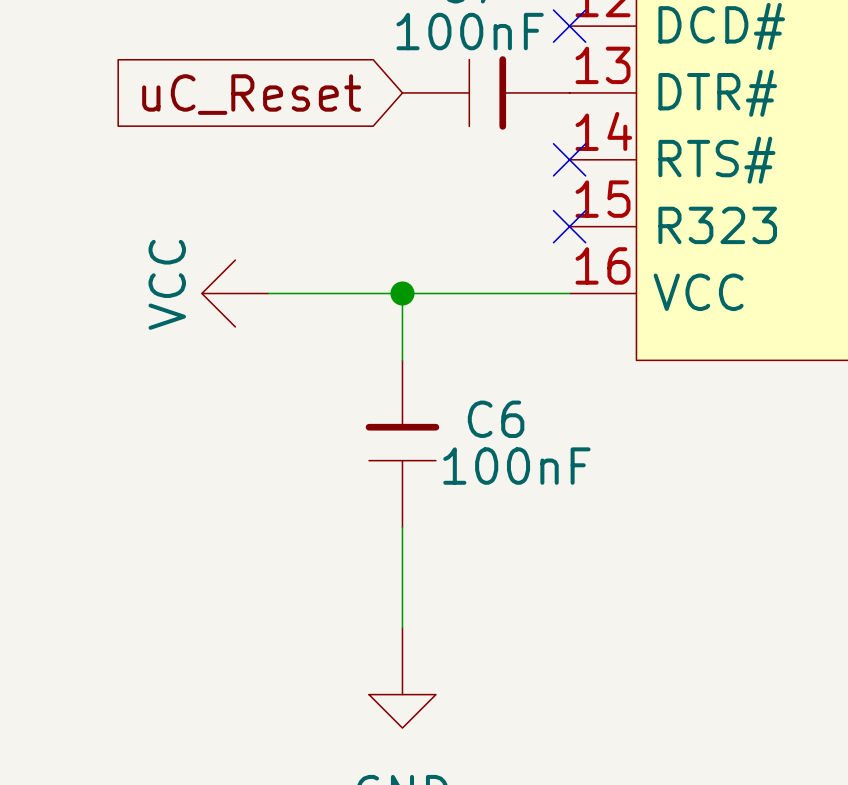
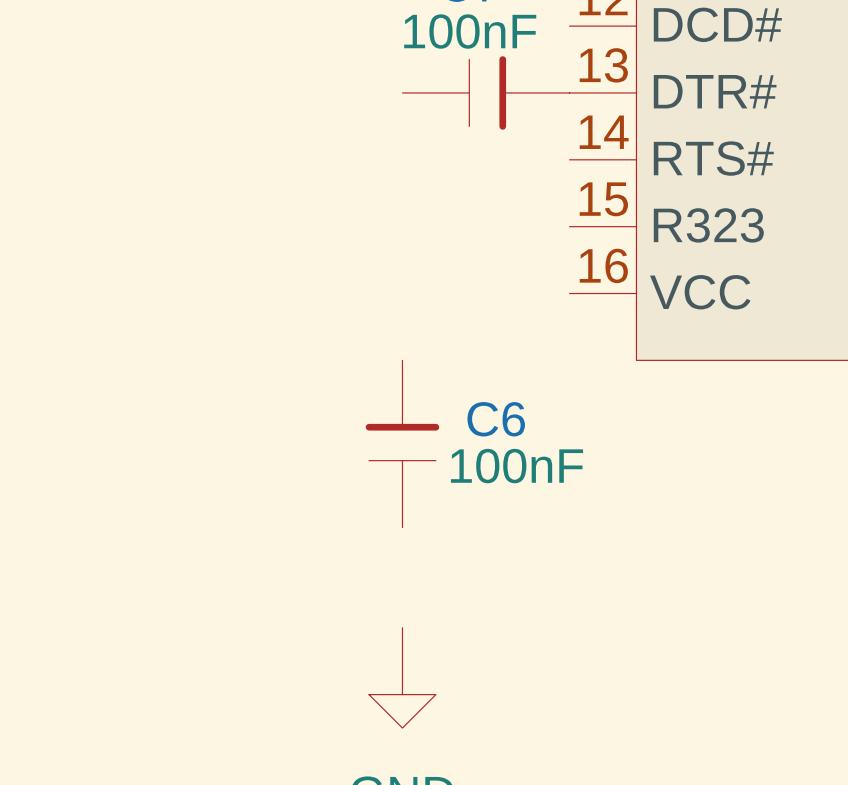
no-connect mark: (569, 26) -> none
global label: uC_Reset (251, 94) -> none
no-connect mark: (569, 159) -> none
no-connect mark: (569, 226) -> none
power symbol: VCC (235, 293) -> none
wire: (268, 293) (569, 293) -> none
wire: (402, 293) (402, 360) -> none
junction: (402, 293) -> none
wire: (402, 527) (402, 627) -> none

